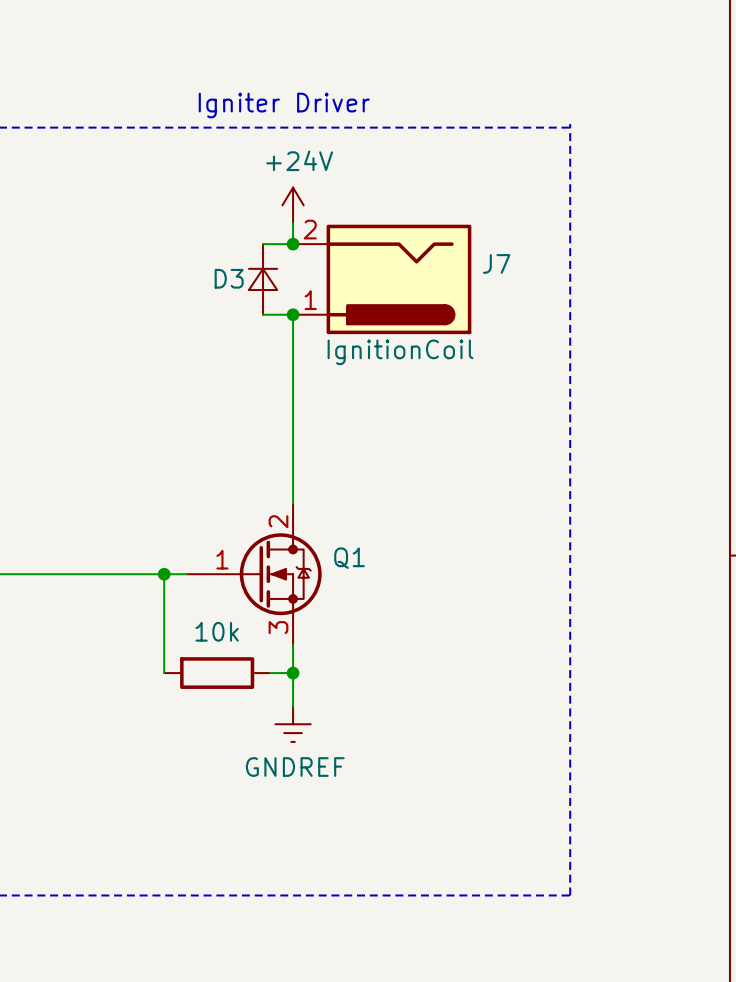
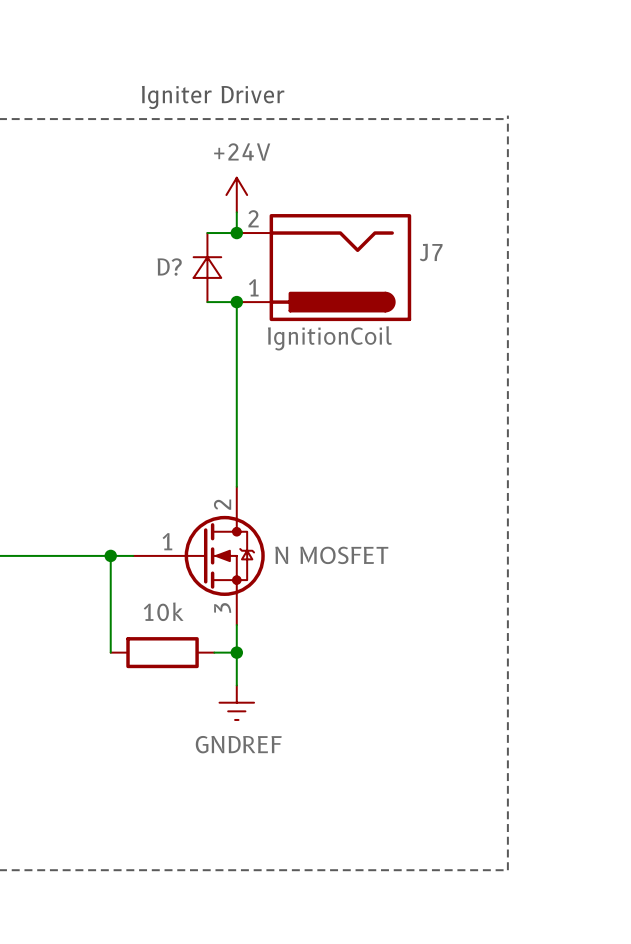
D3 name: D3 (229, 278) -> D? (169, 267)
Q1 name: Q1 (349, 558) -> none
Q1 value: none -> N MOSFET (331, 555)

